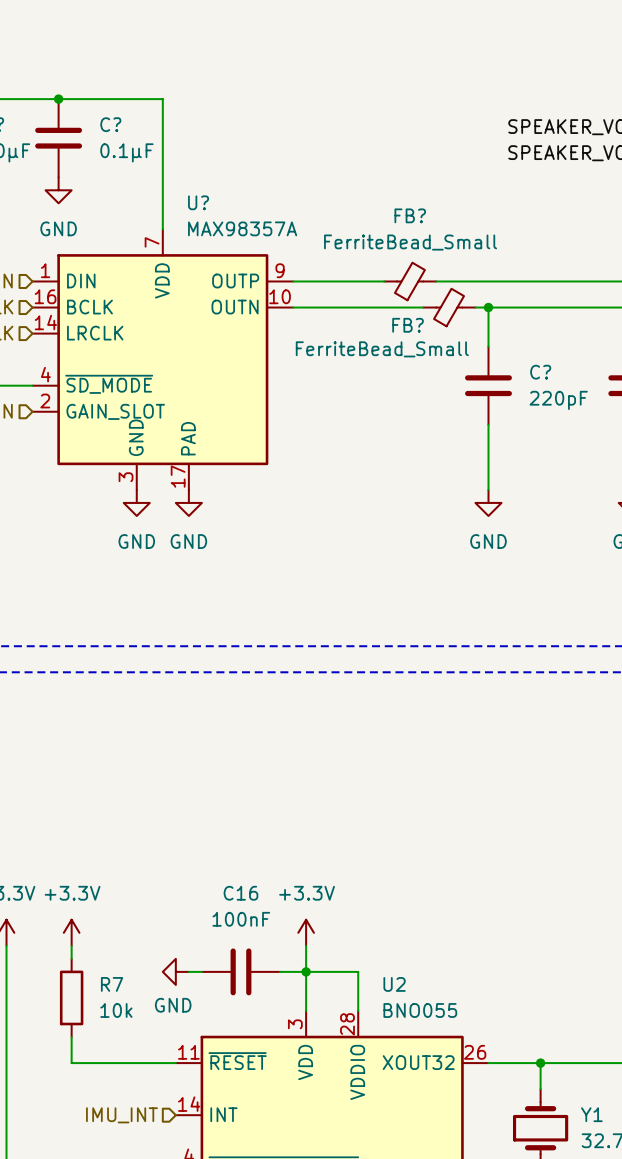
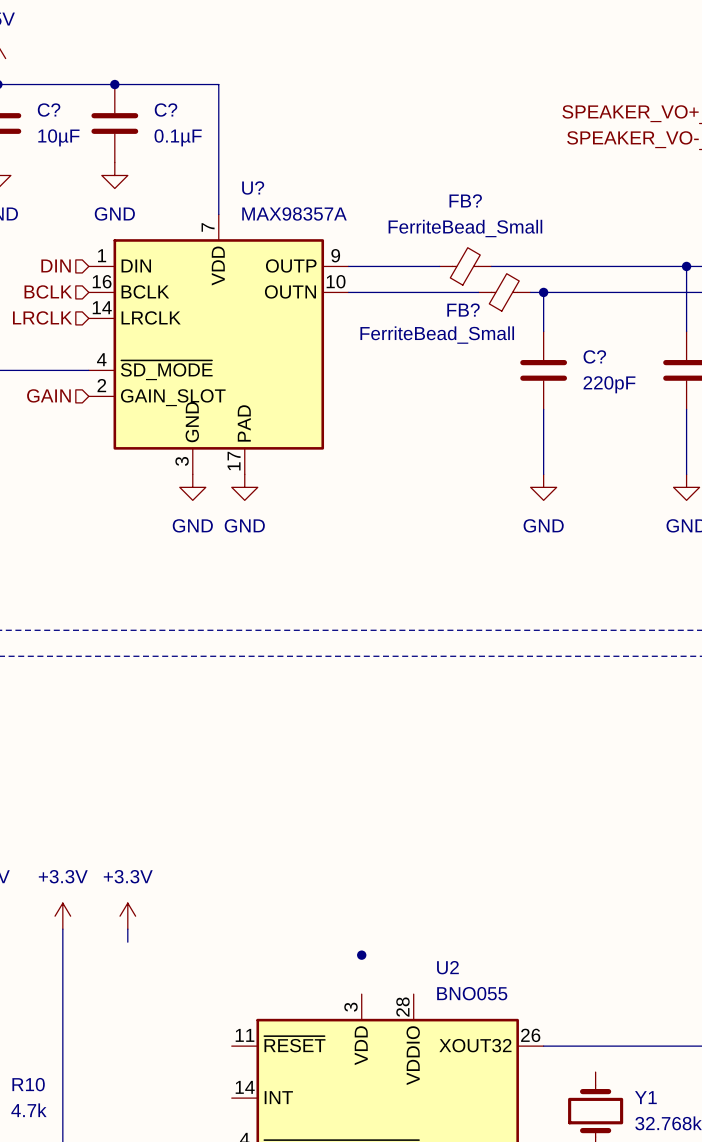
power symbol: +3.3V (306, 932) -> none
wire: (306, 945) (306, 1010) -> none
power symbol: GND (175, 971) -> none
wire: (188, 971) (201, 971) -> none
C16: 100nF (240, 971) -> none
wire: (280, 971) (358, 971) (358, 1010) -> none
R7: 10k (71, 997) -> none
wire: (71, 1037) (71, 1063) (175, 1063) -> none
wire: (540, 1063) (540, 1089) -> none
junction: (540, 1063) -> none
hierarchical label: IMU_INT (121, 1115) -> none

